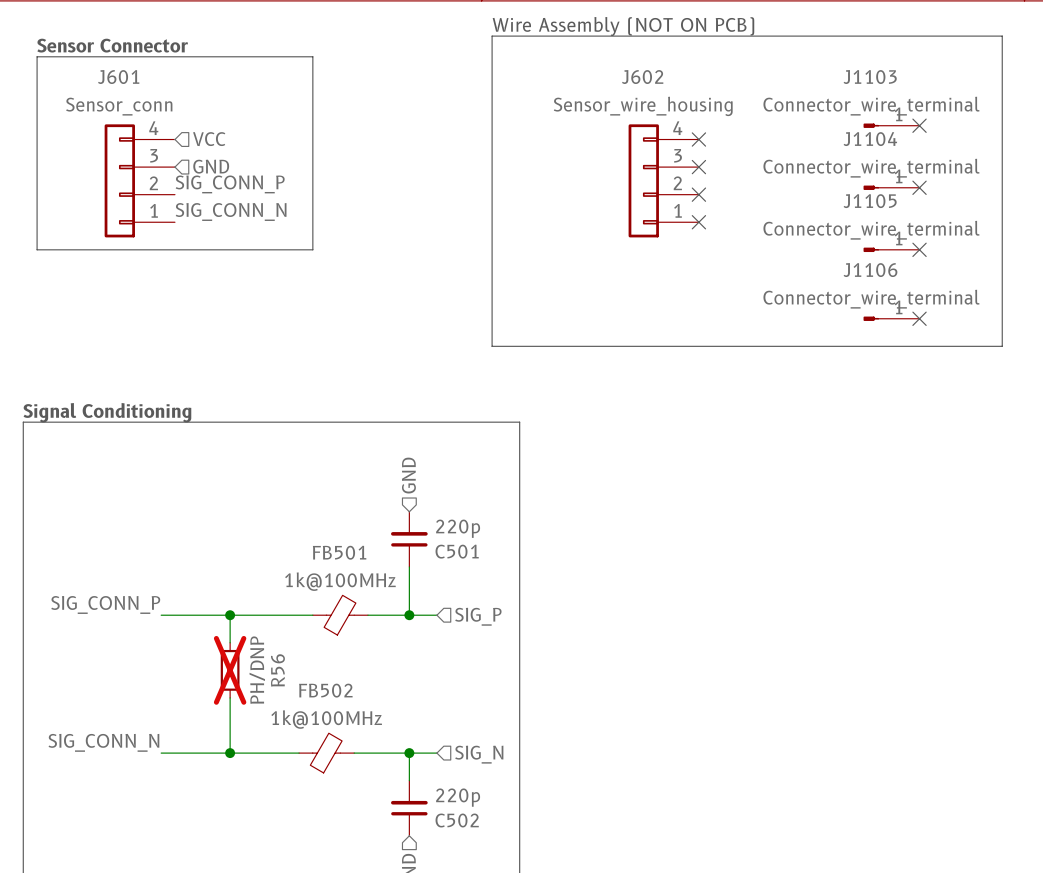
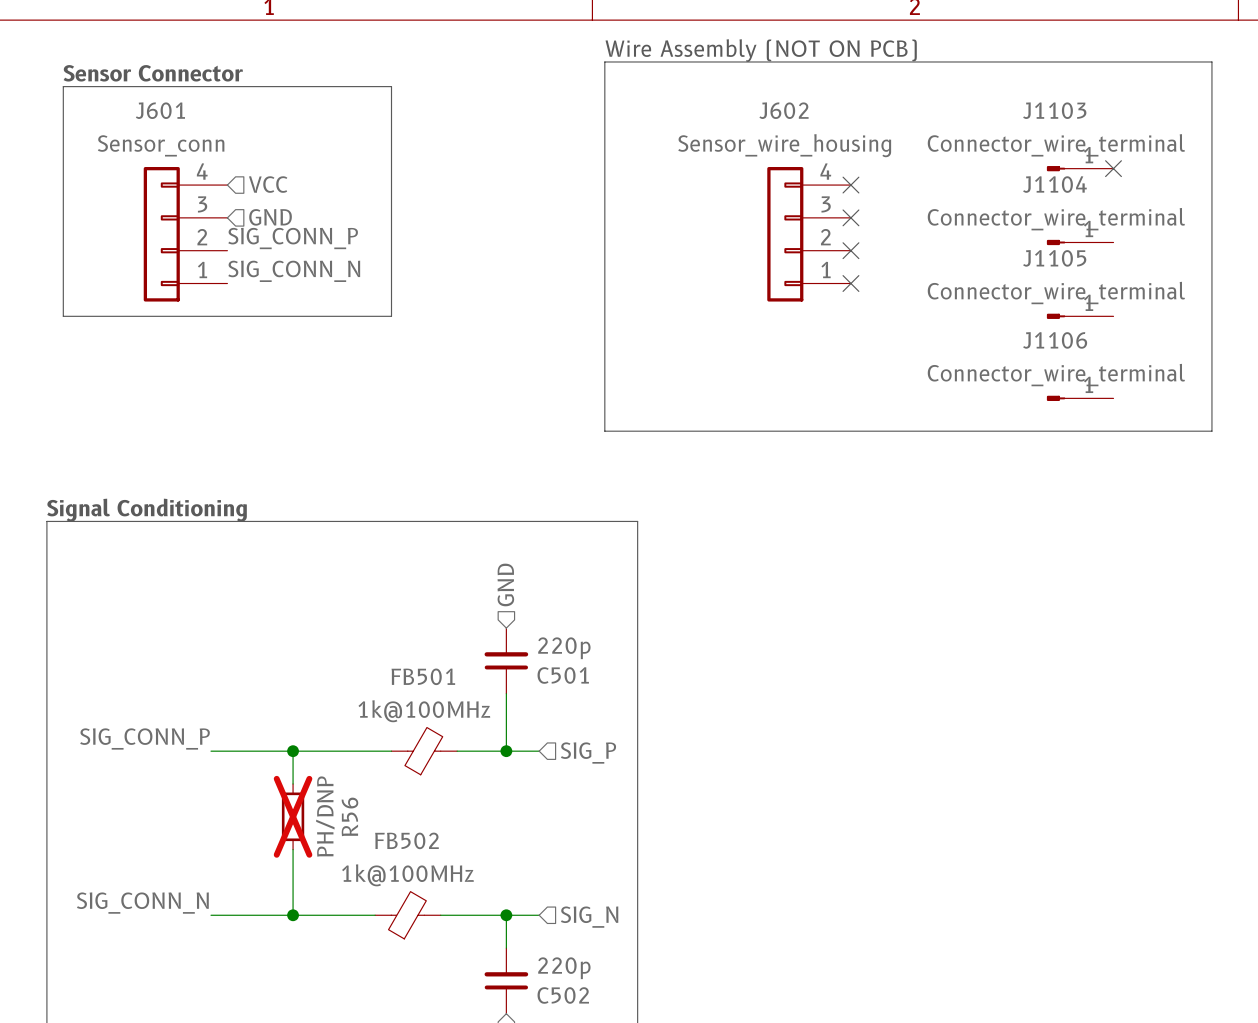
no-connect mark: (919, 187) -> none
no-connect mark: (919, 249) -> none
no-connect mark: (919, 318) -> none

